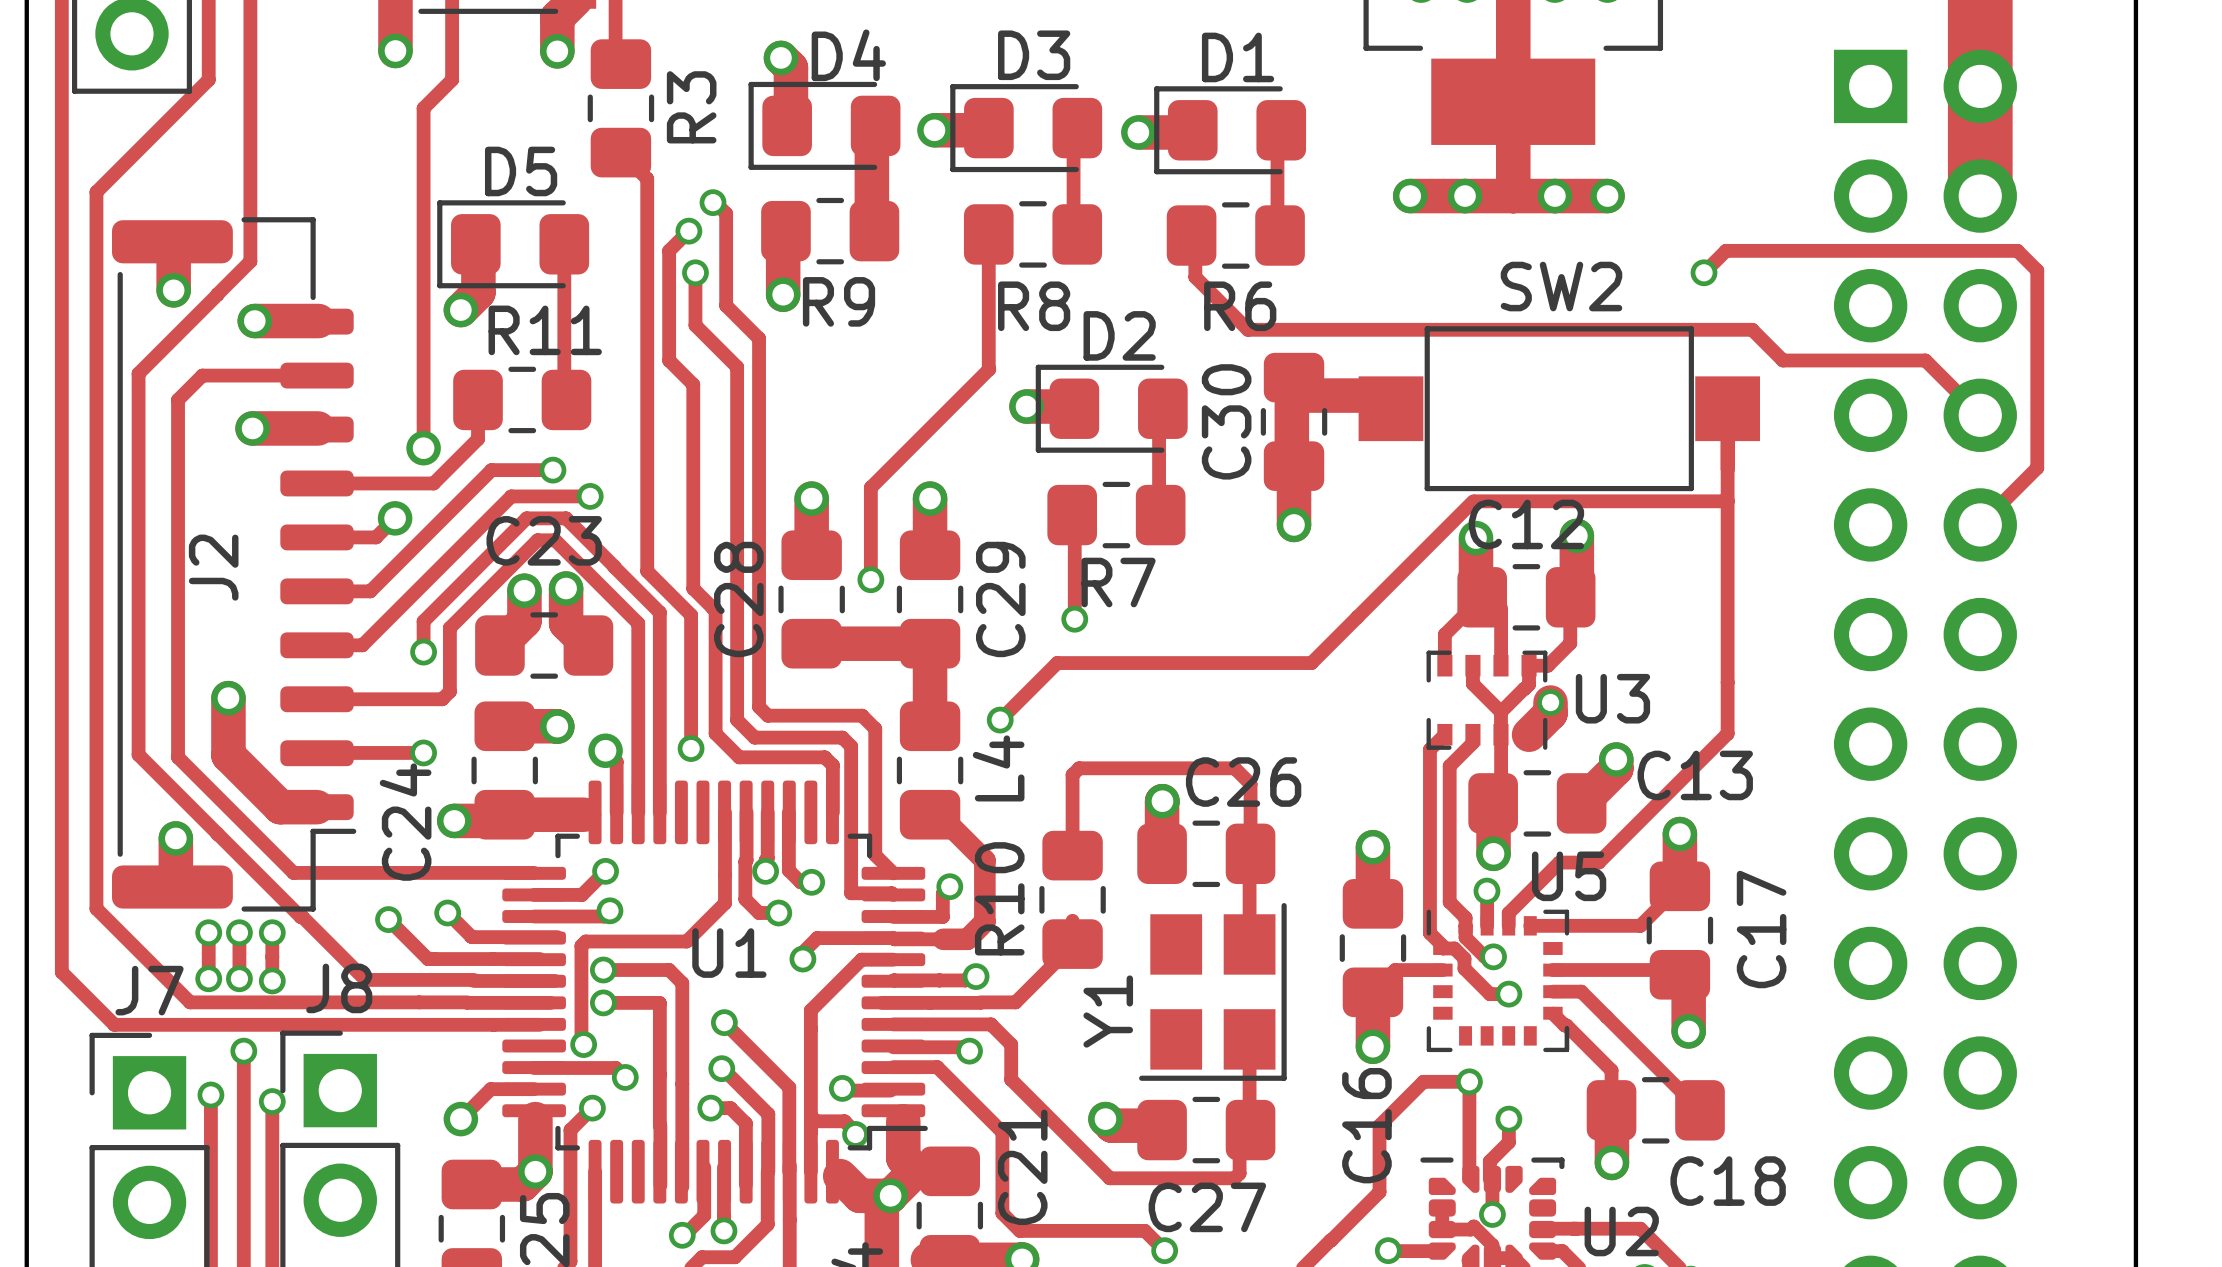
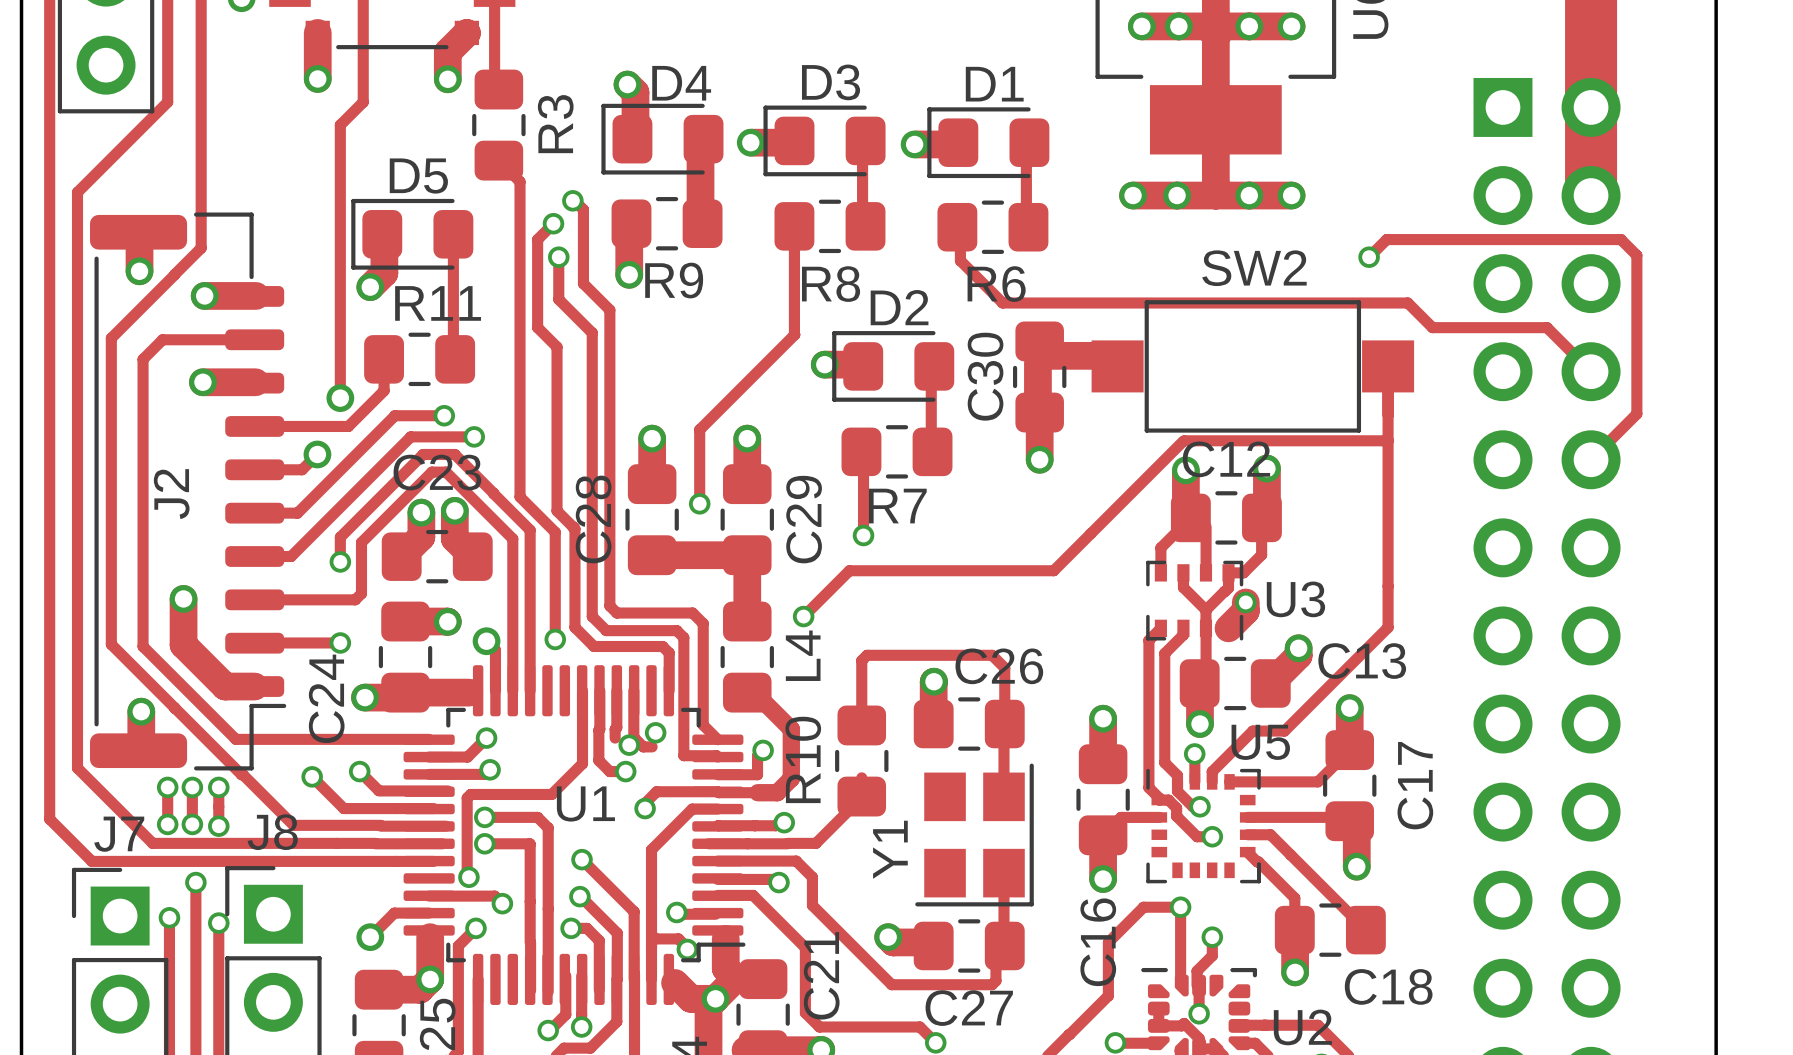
via position: (765, 871) -> (629, 745)
via position: (811, 882) -> (655, 732)

